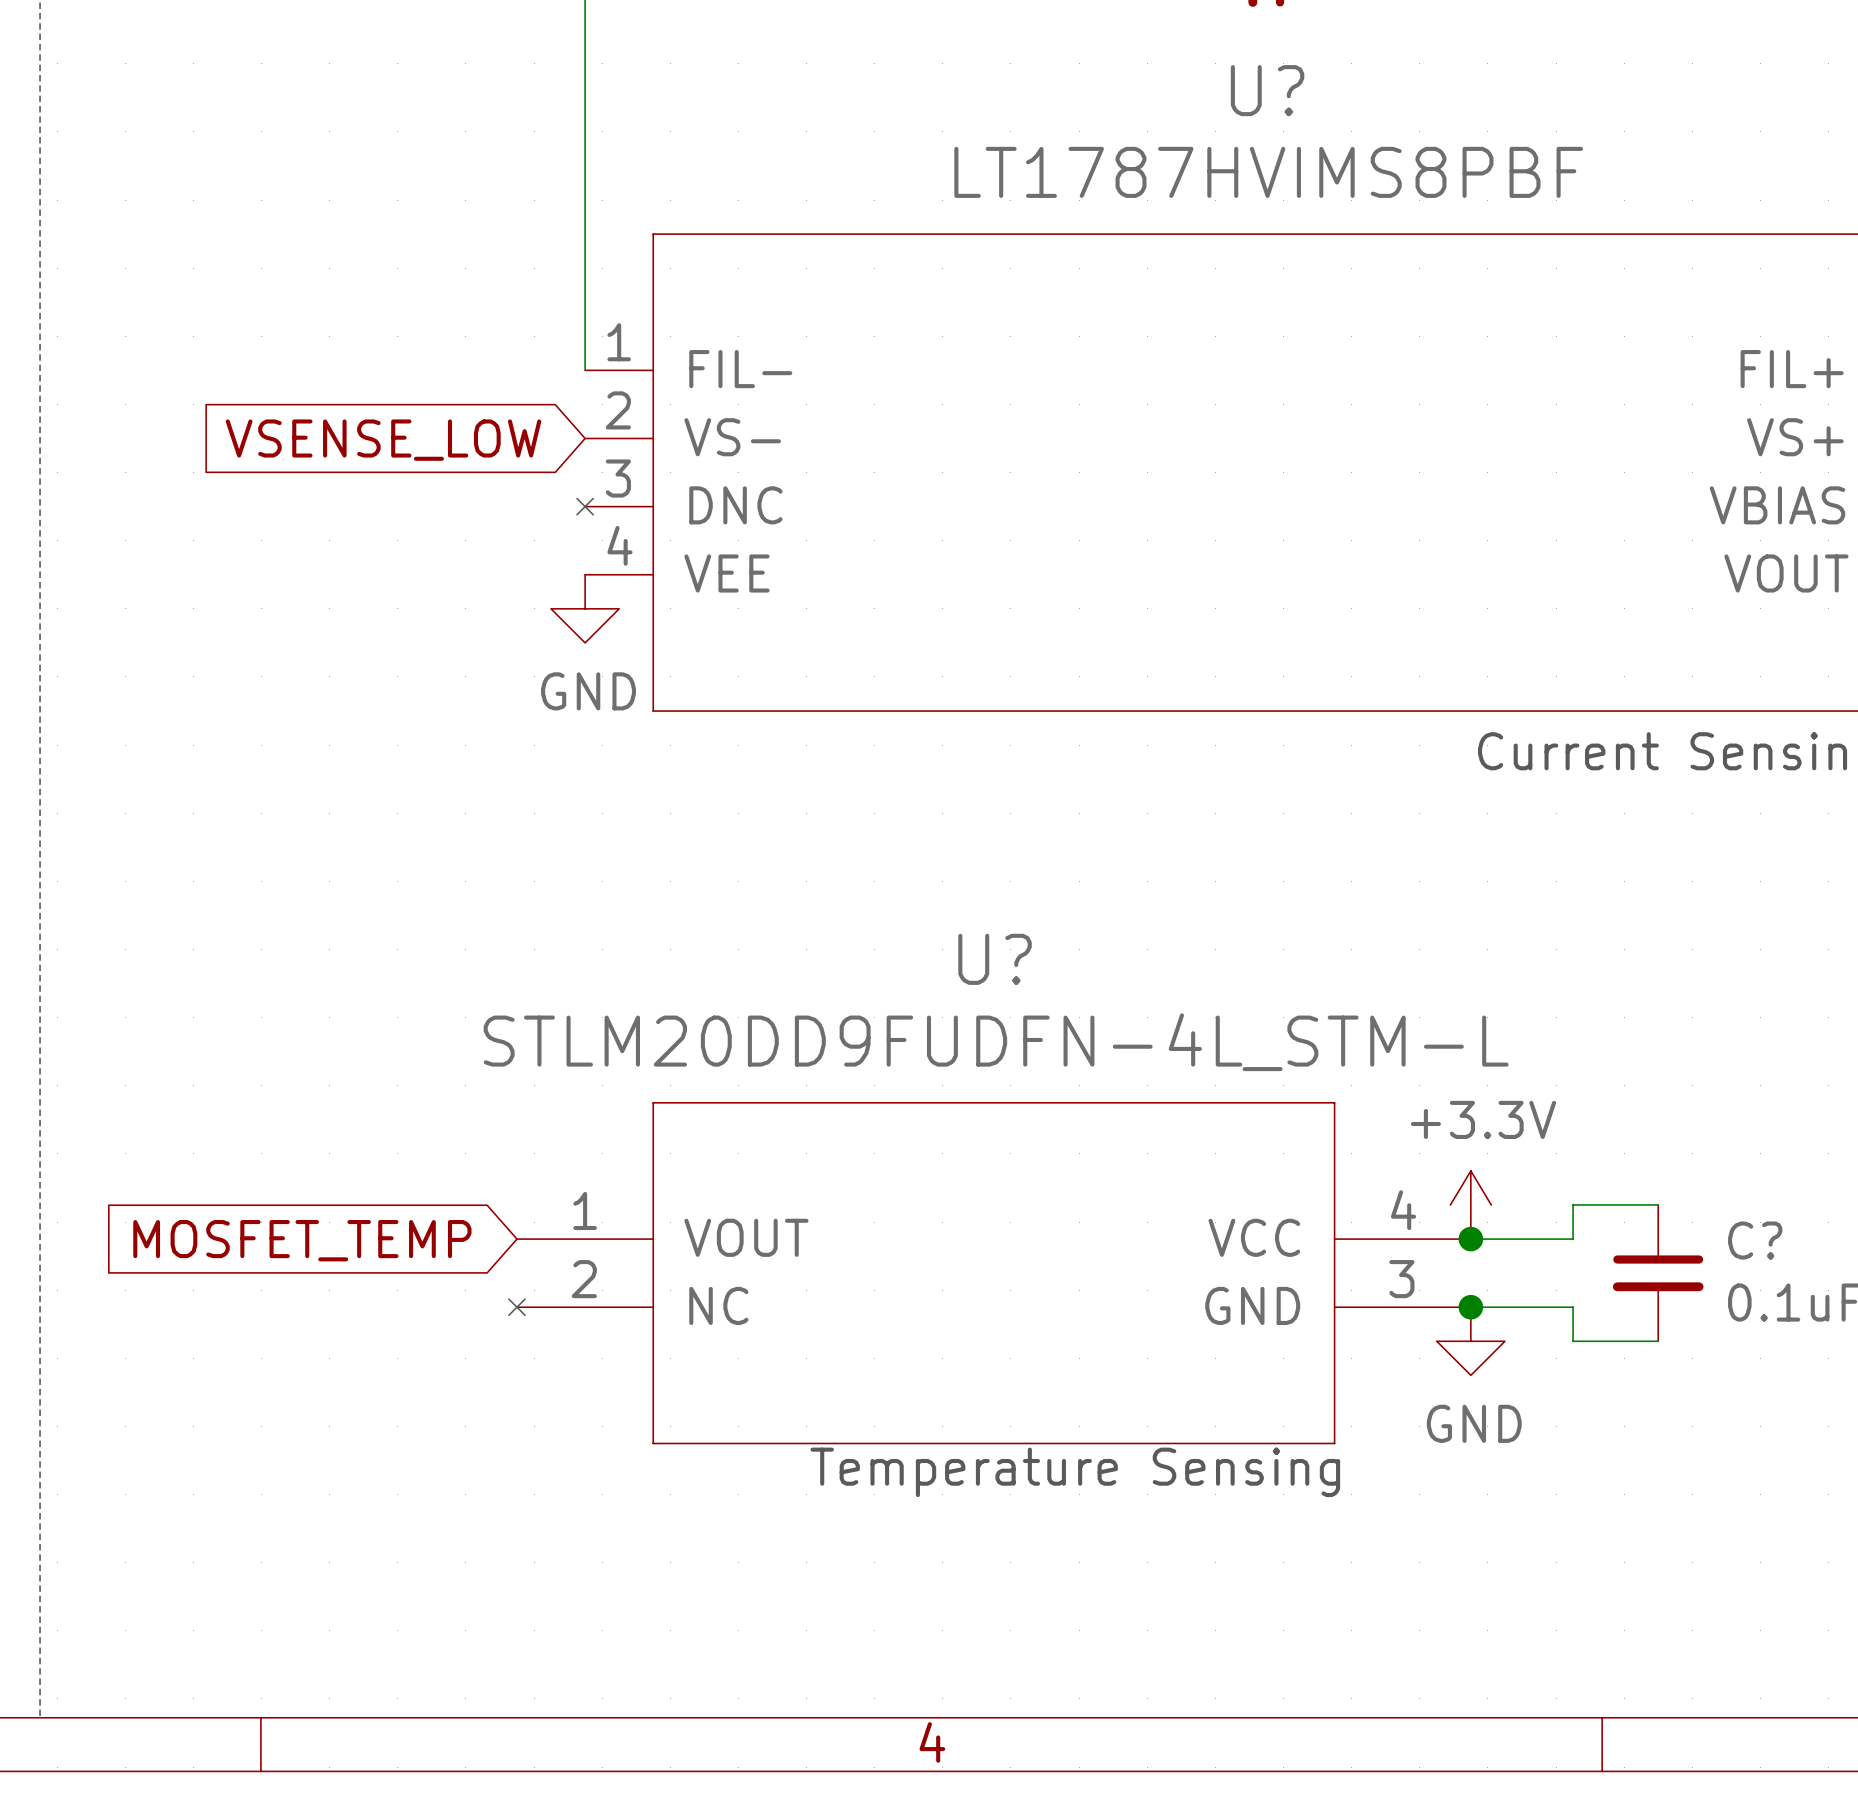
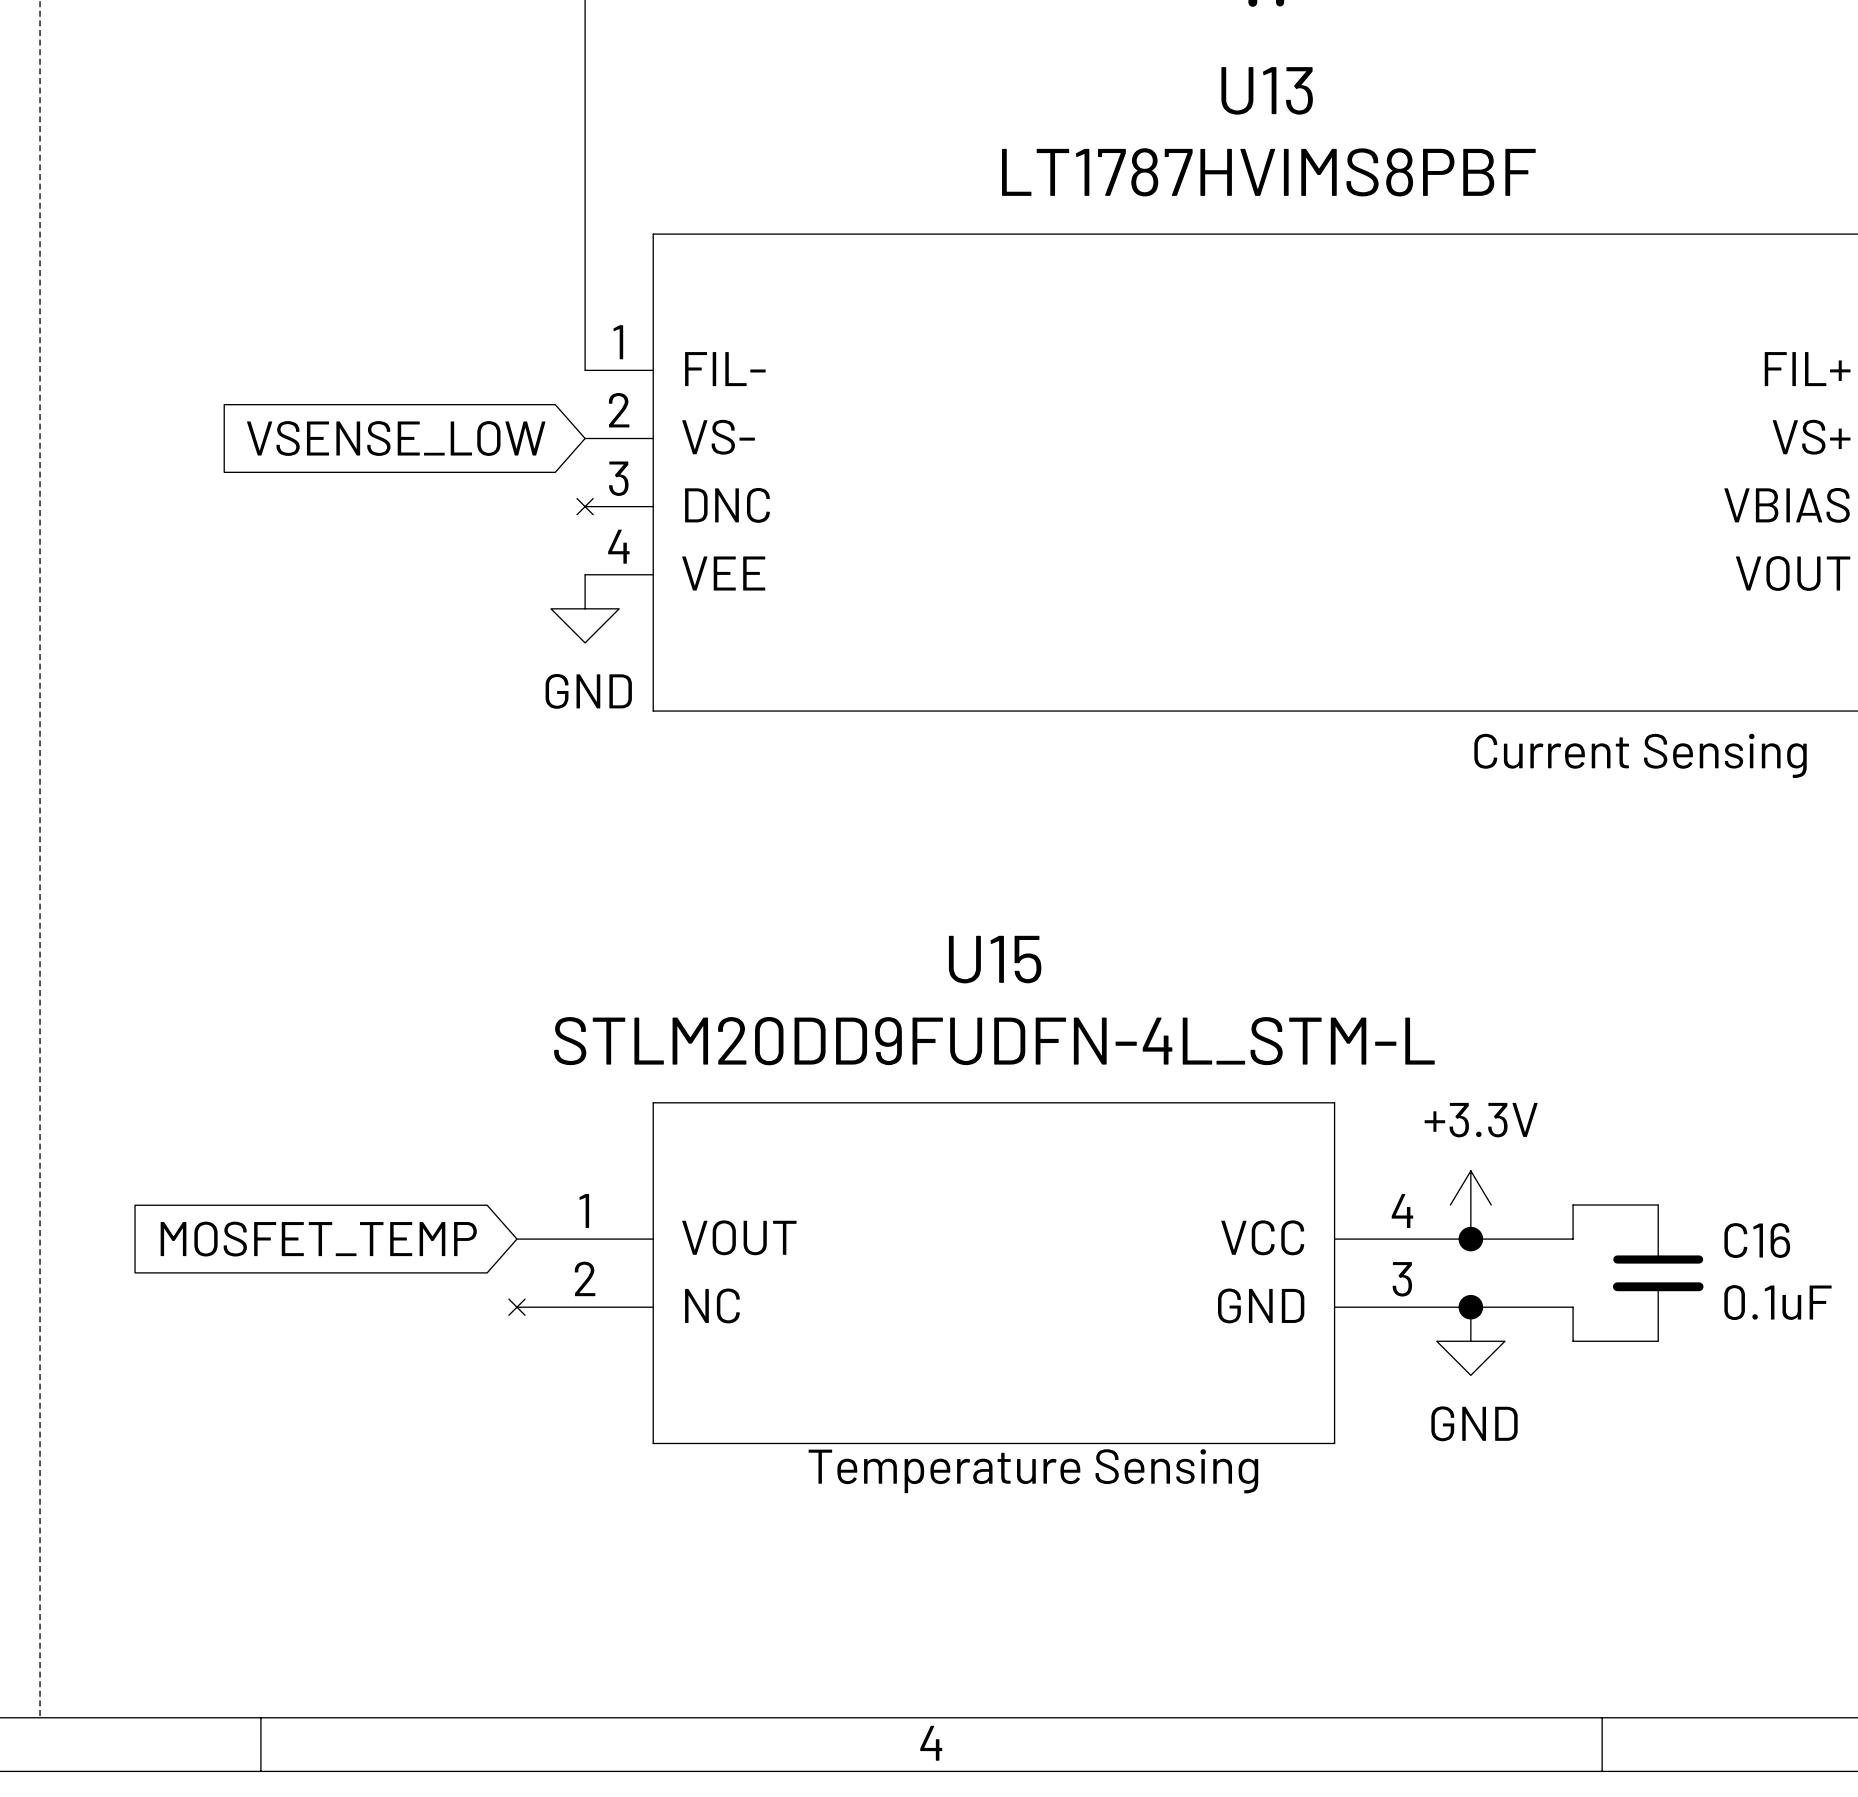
U? name: U? (1267, 90) -> U13 (1267, 90)
U? name: U? (995, 959) -> U15 (995, 959)
C? name: C? (1755, 1240) -> C16 (1757, 1240)

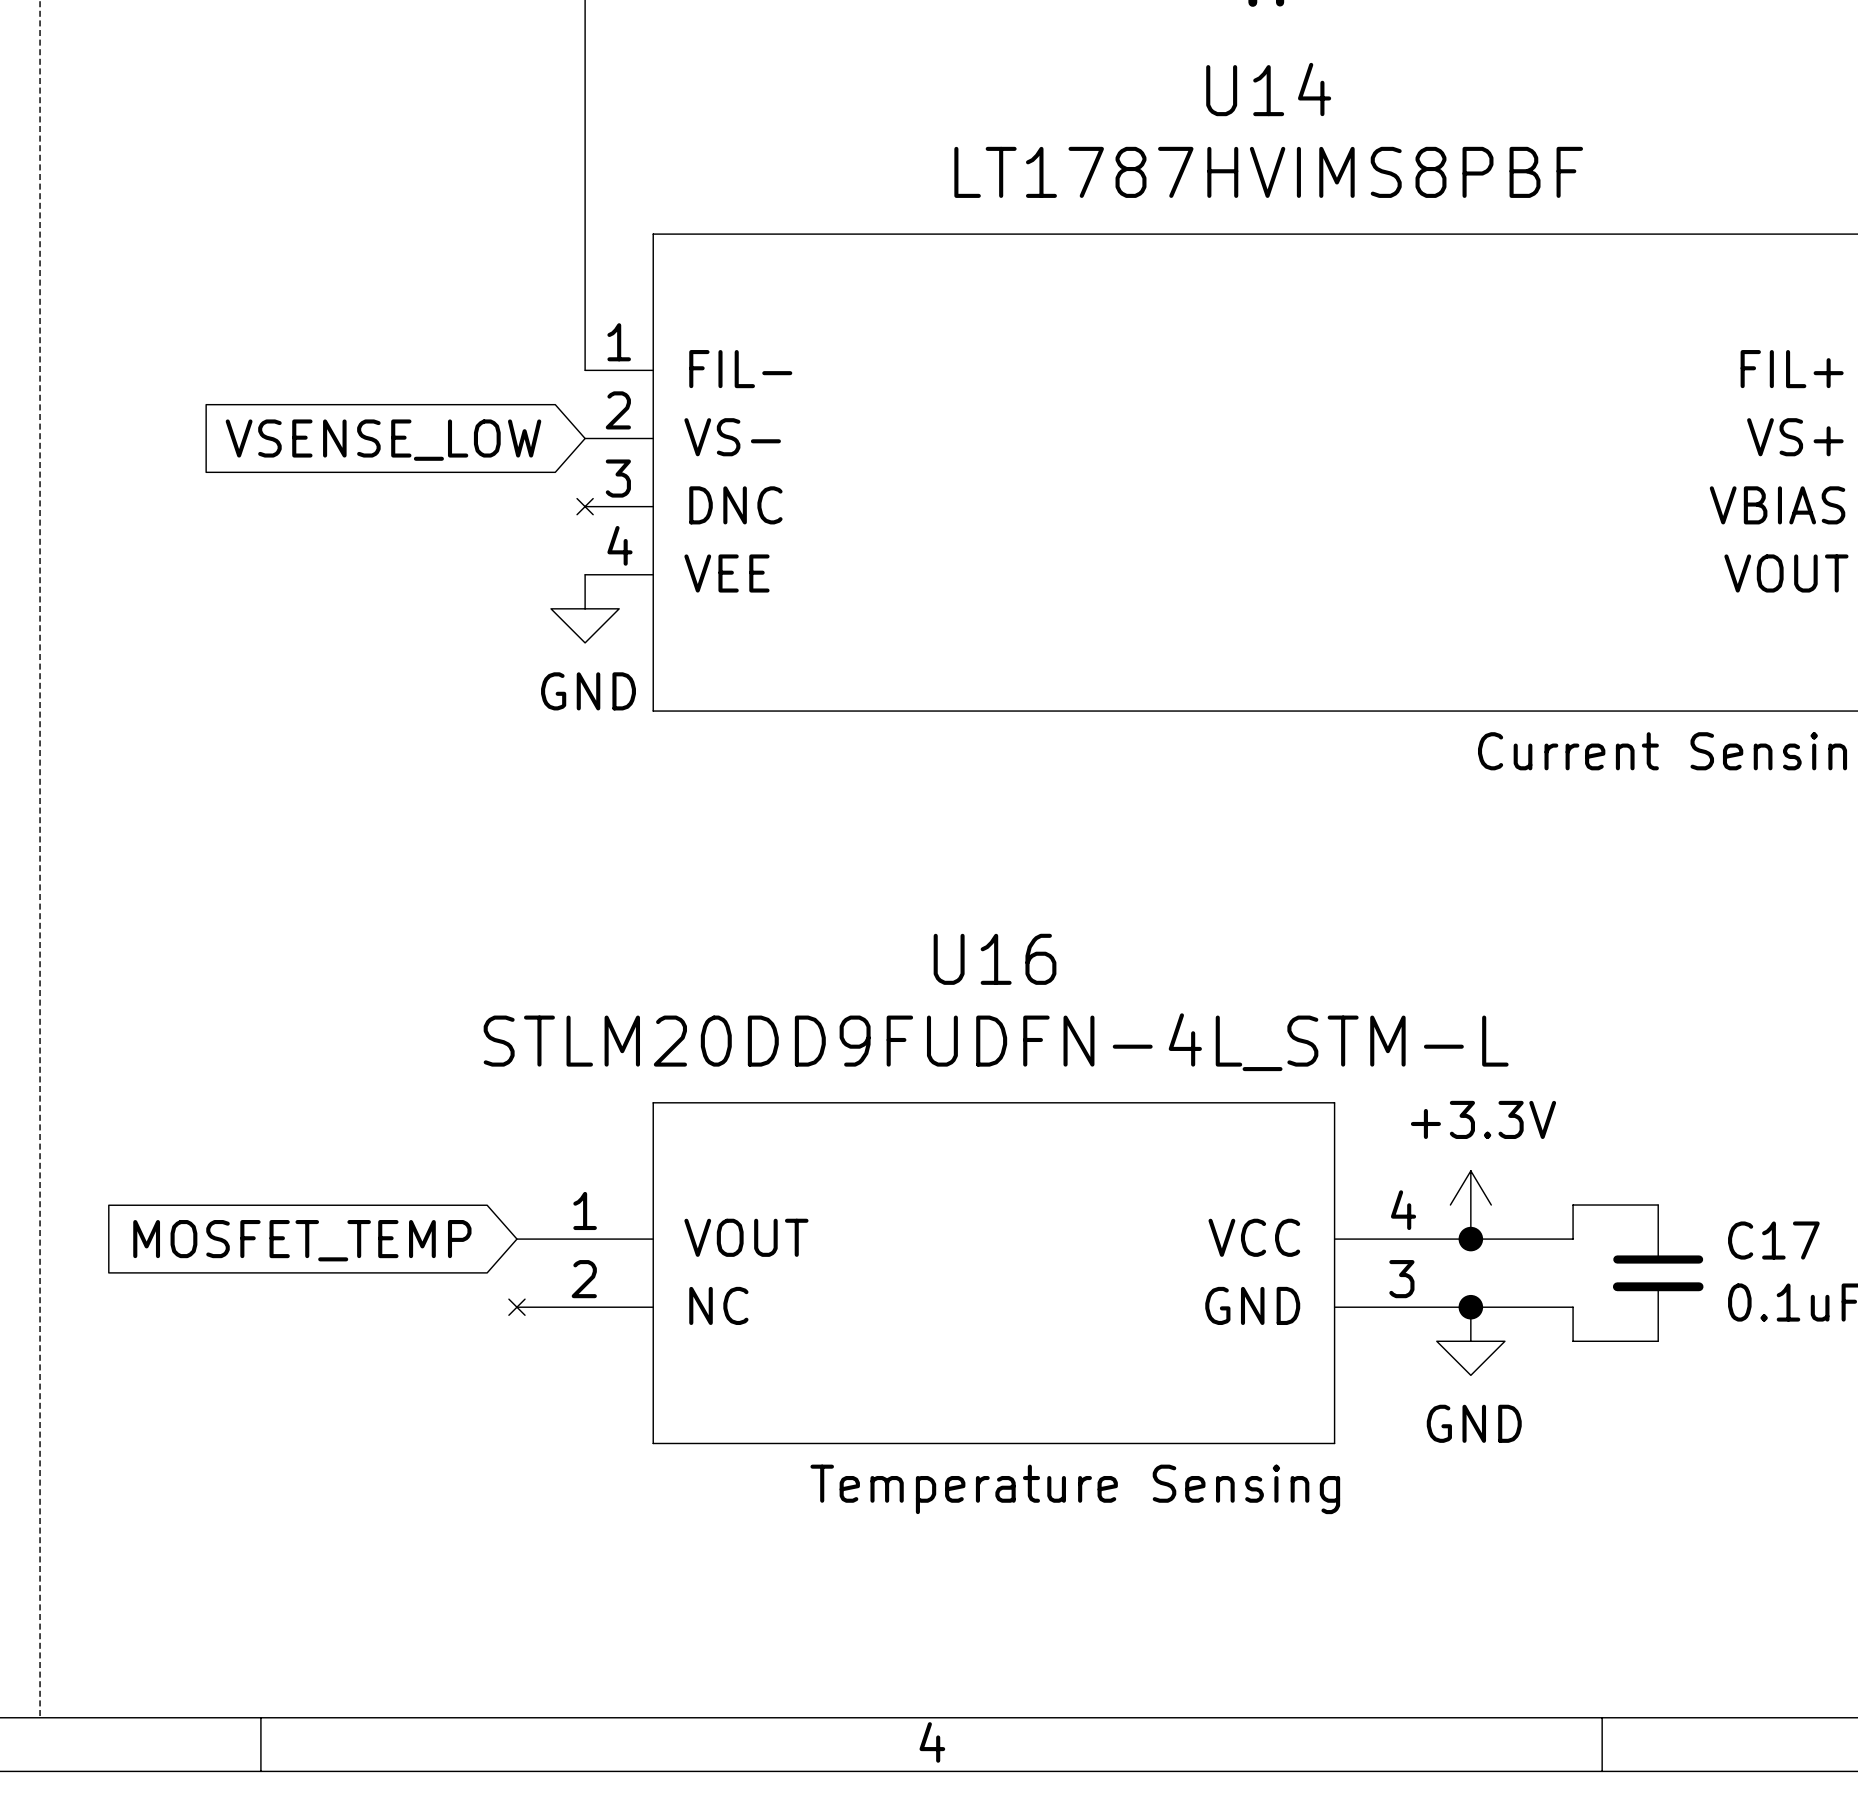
U13 name: U13 (1267, 90) -> U14 (1268, 89)
U15 name: U15 (995, 959) -> U16 (995, 959)
C16 name: C16 (1757, 1240) -> C17 (1773, 1240)
text position: Temperature Sensing (1033, 1471) -> Temperature Sensing (1075, 1489)

